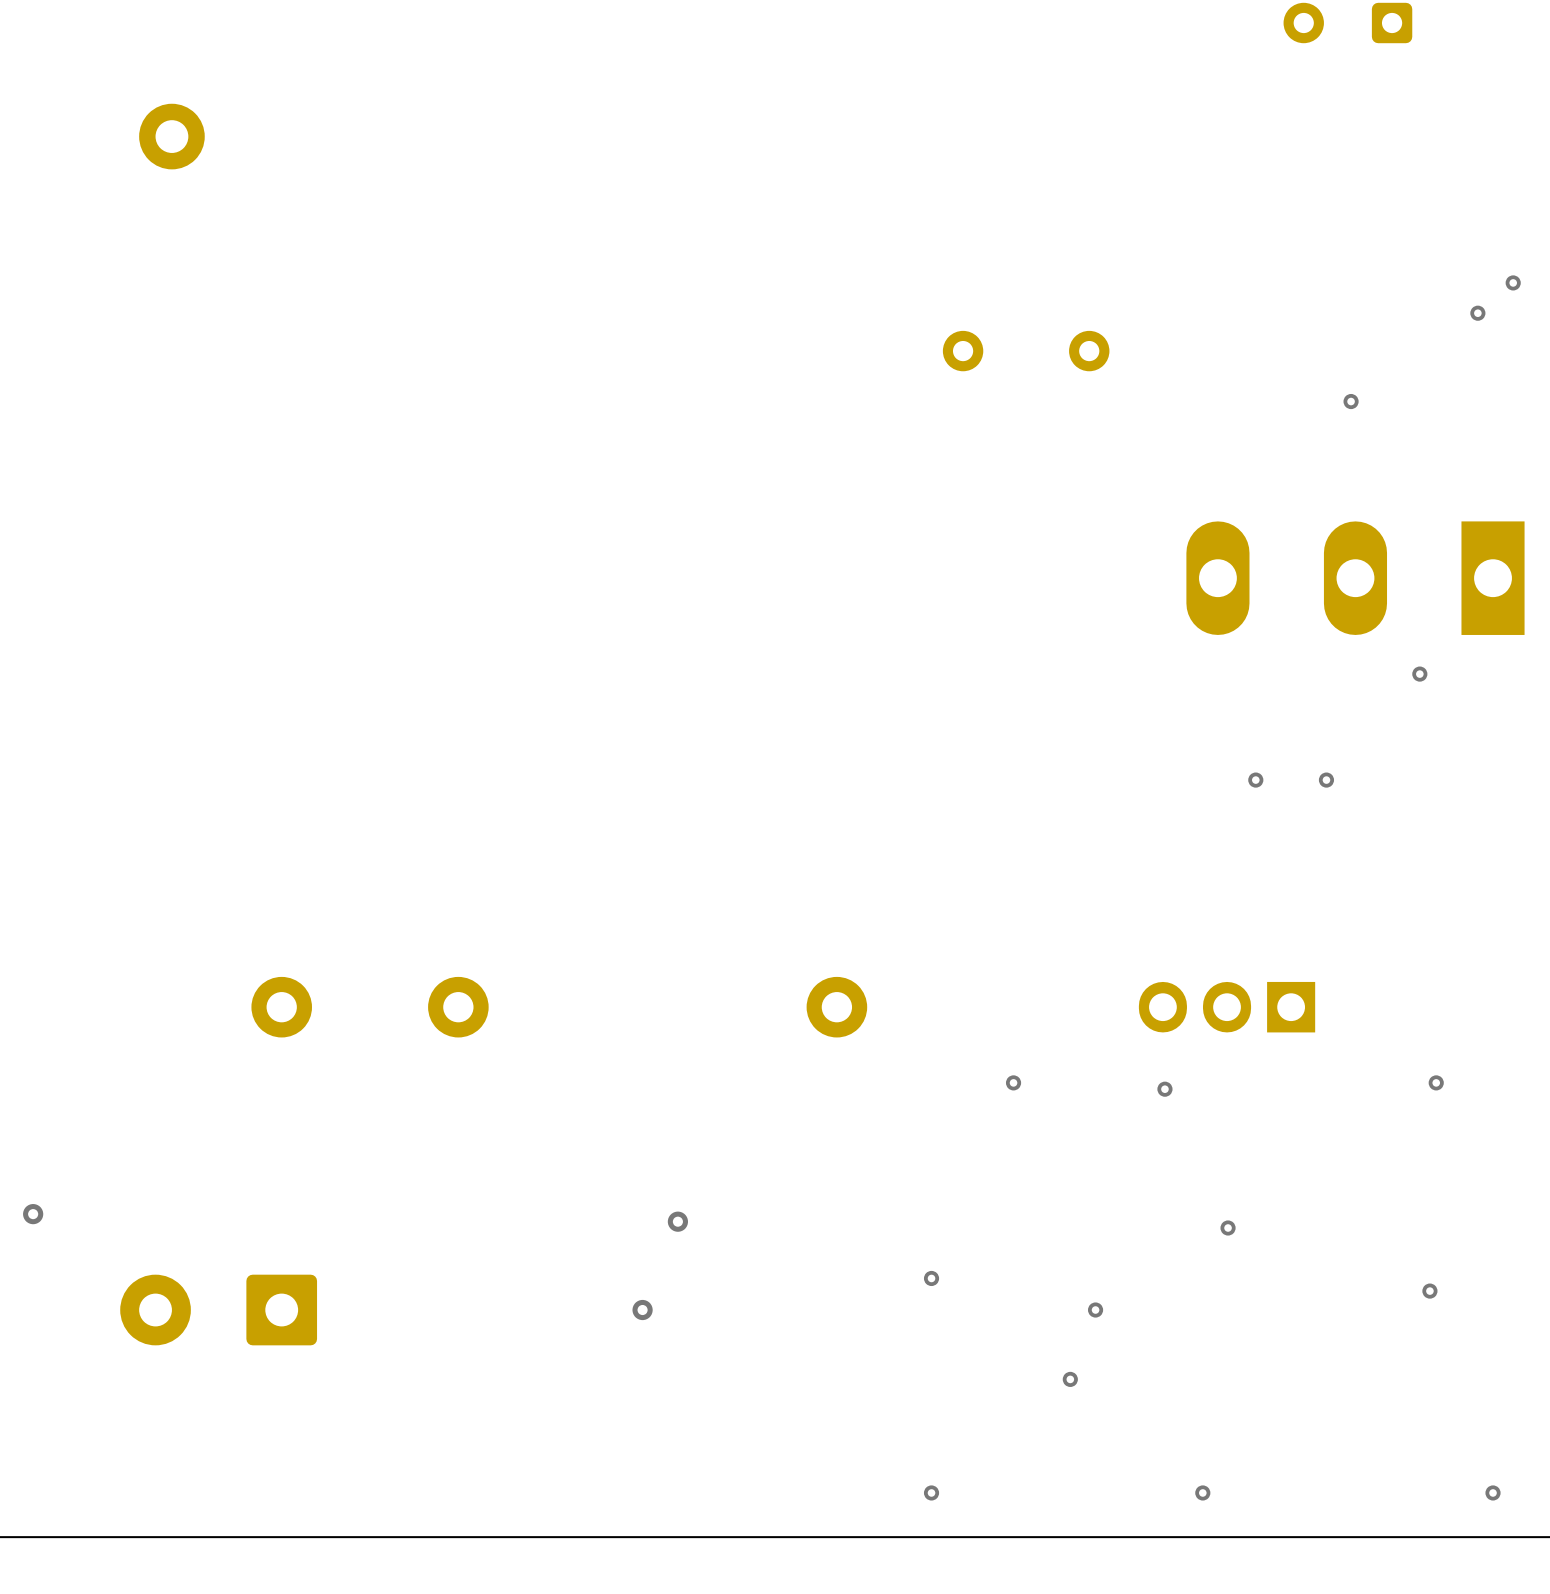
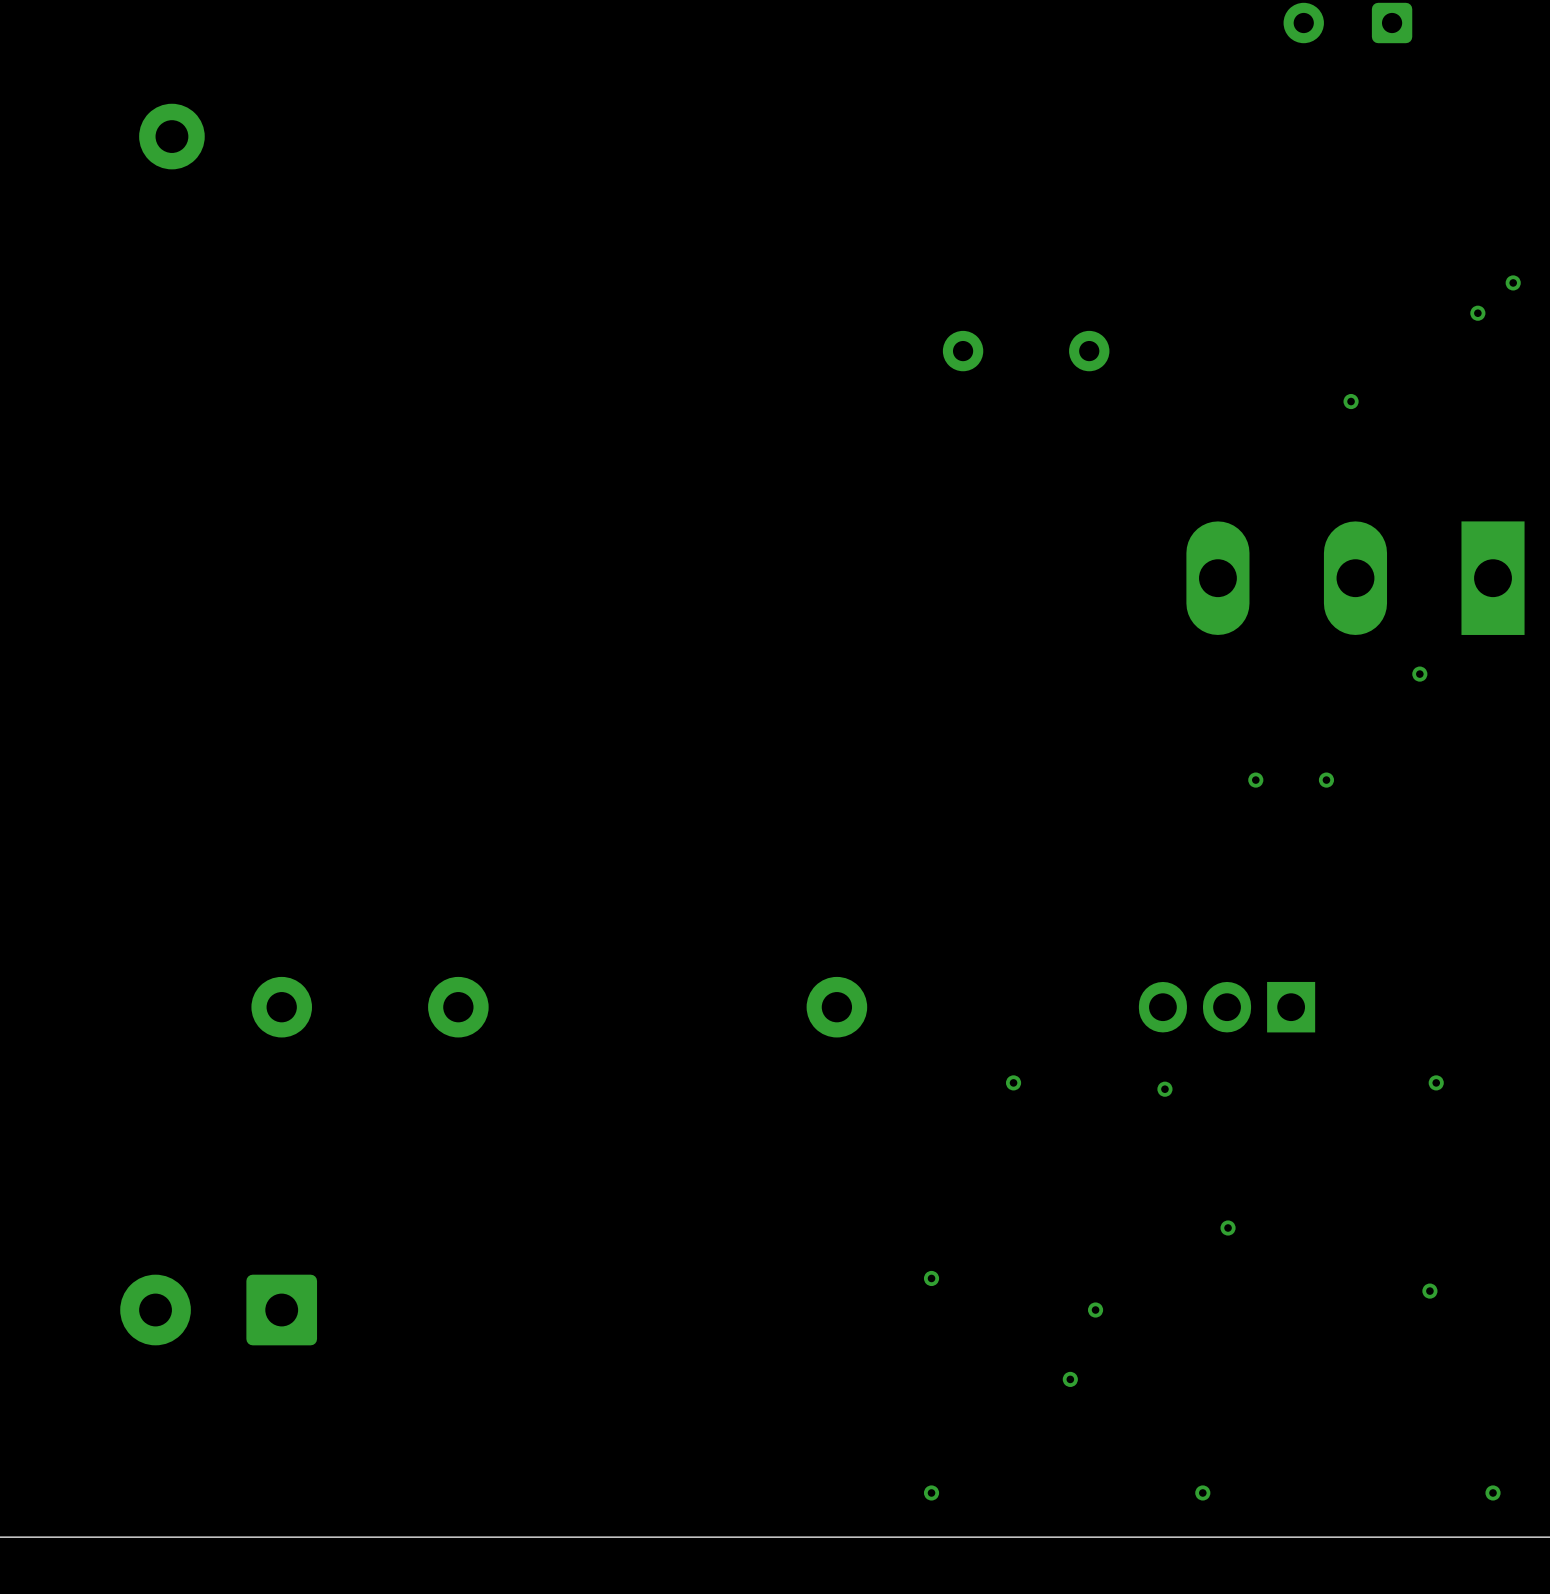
via: (33, 1214) -> none
via: (677, 1221) -> none
via: (642, 1310) -> none

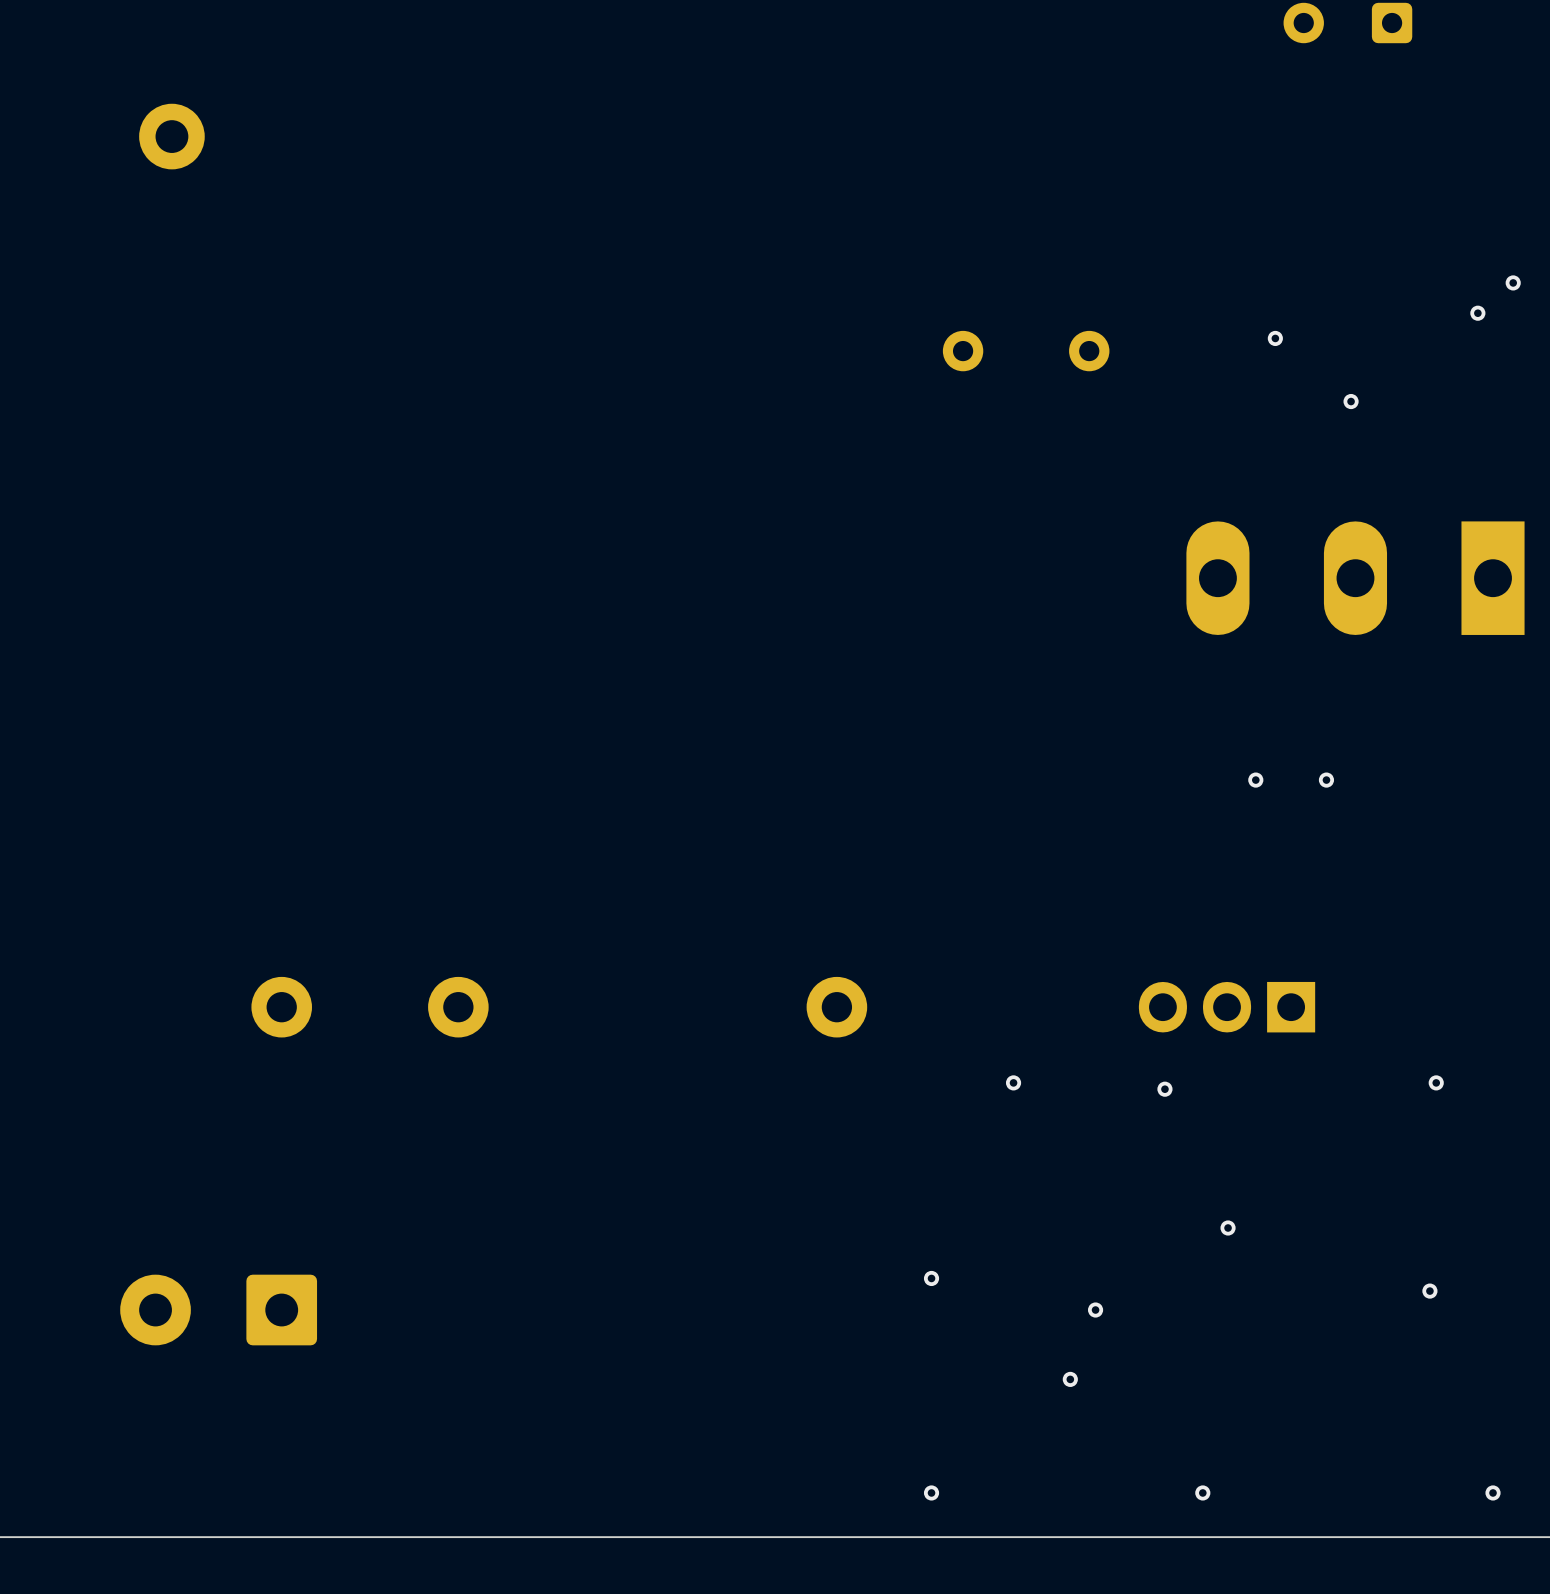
via: none -> (1275, 338)
via: (1419, 674) -> none

